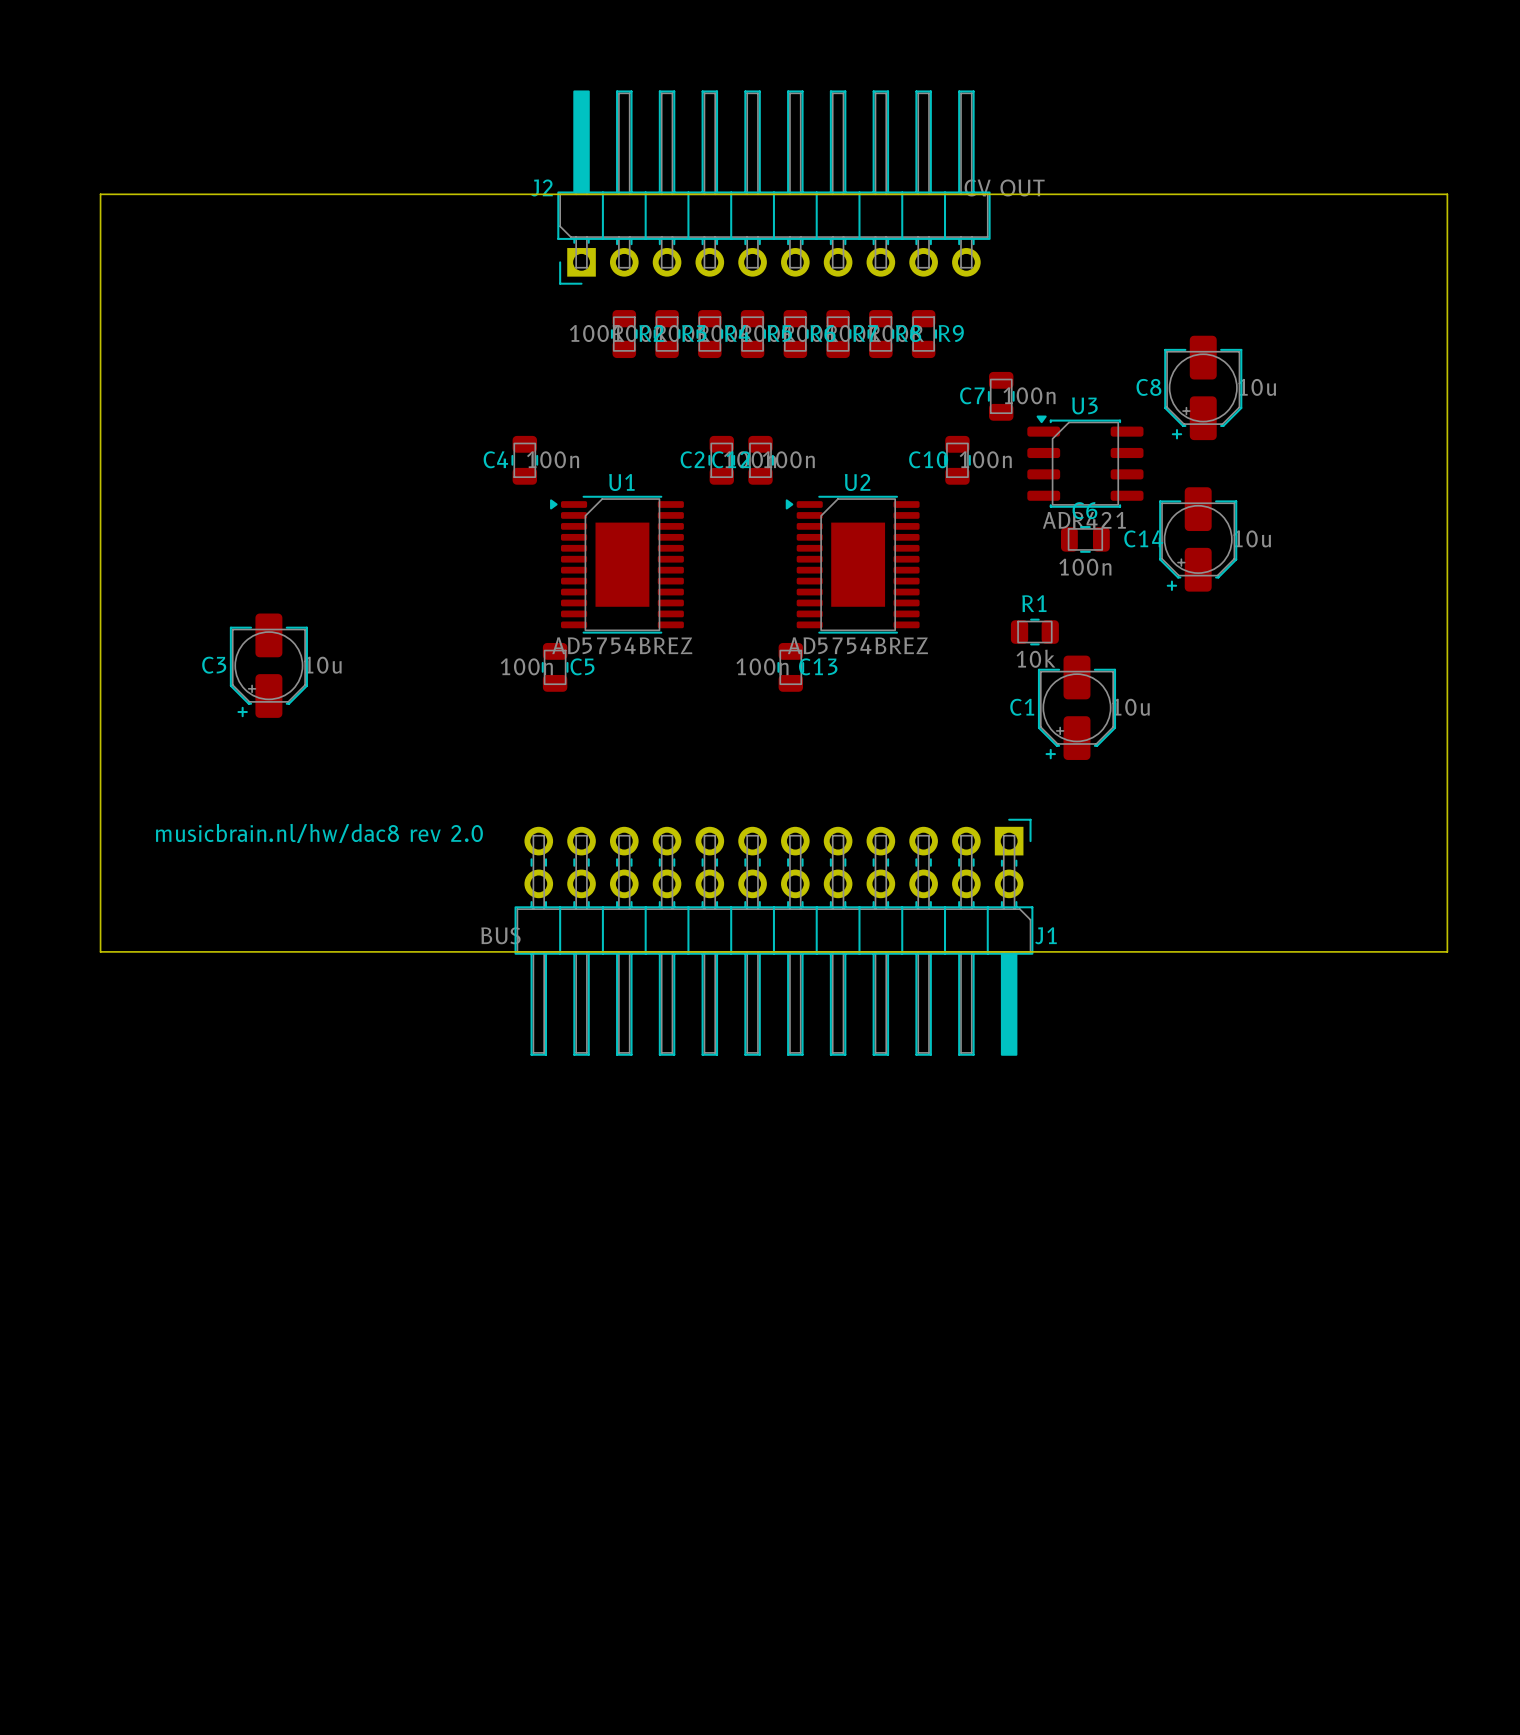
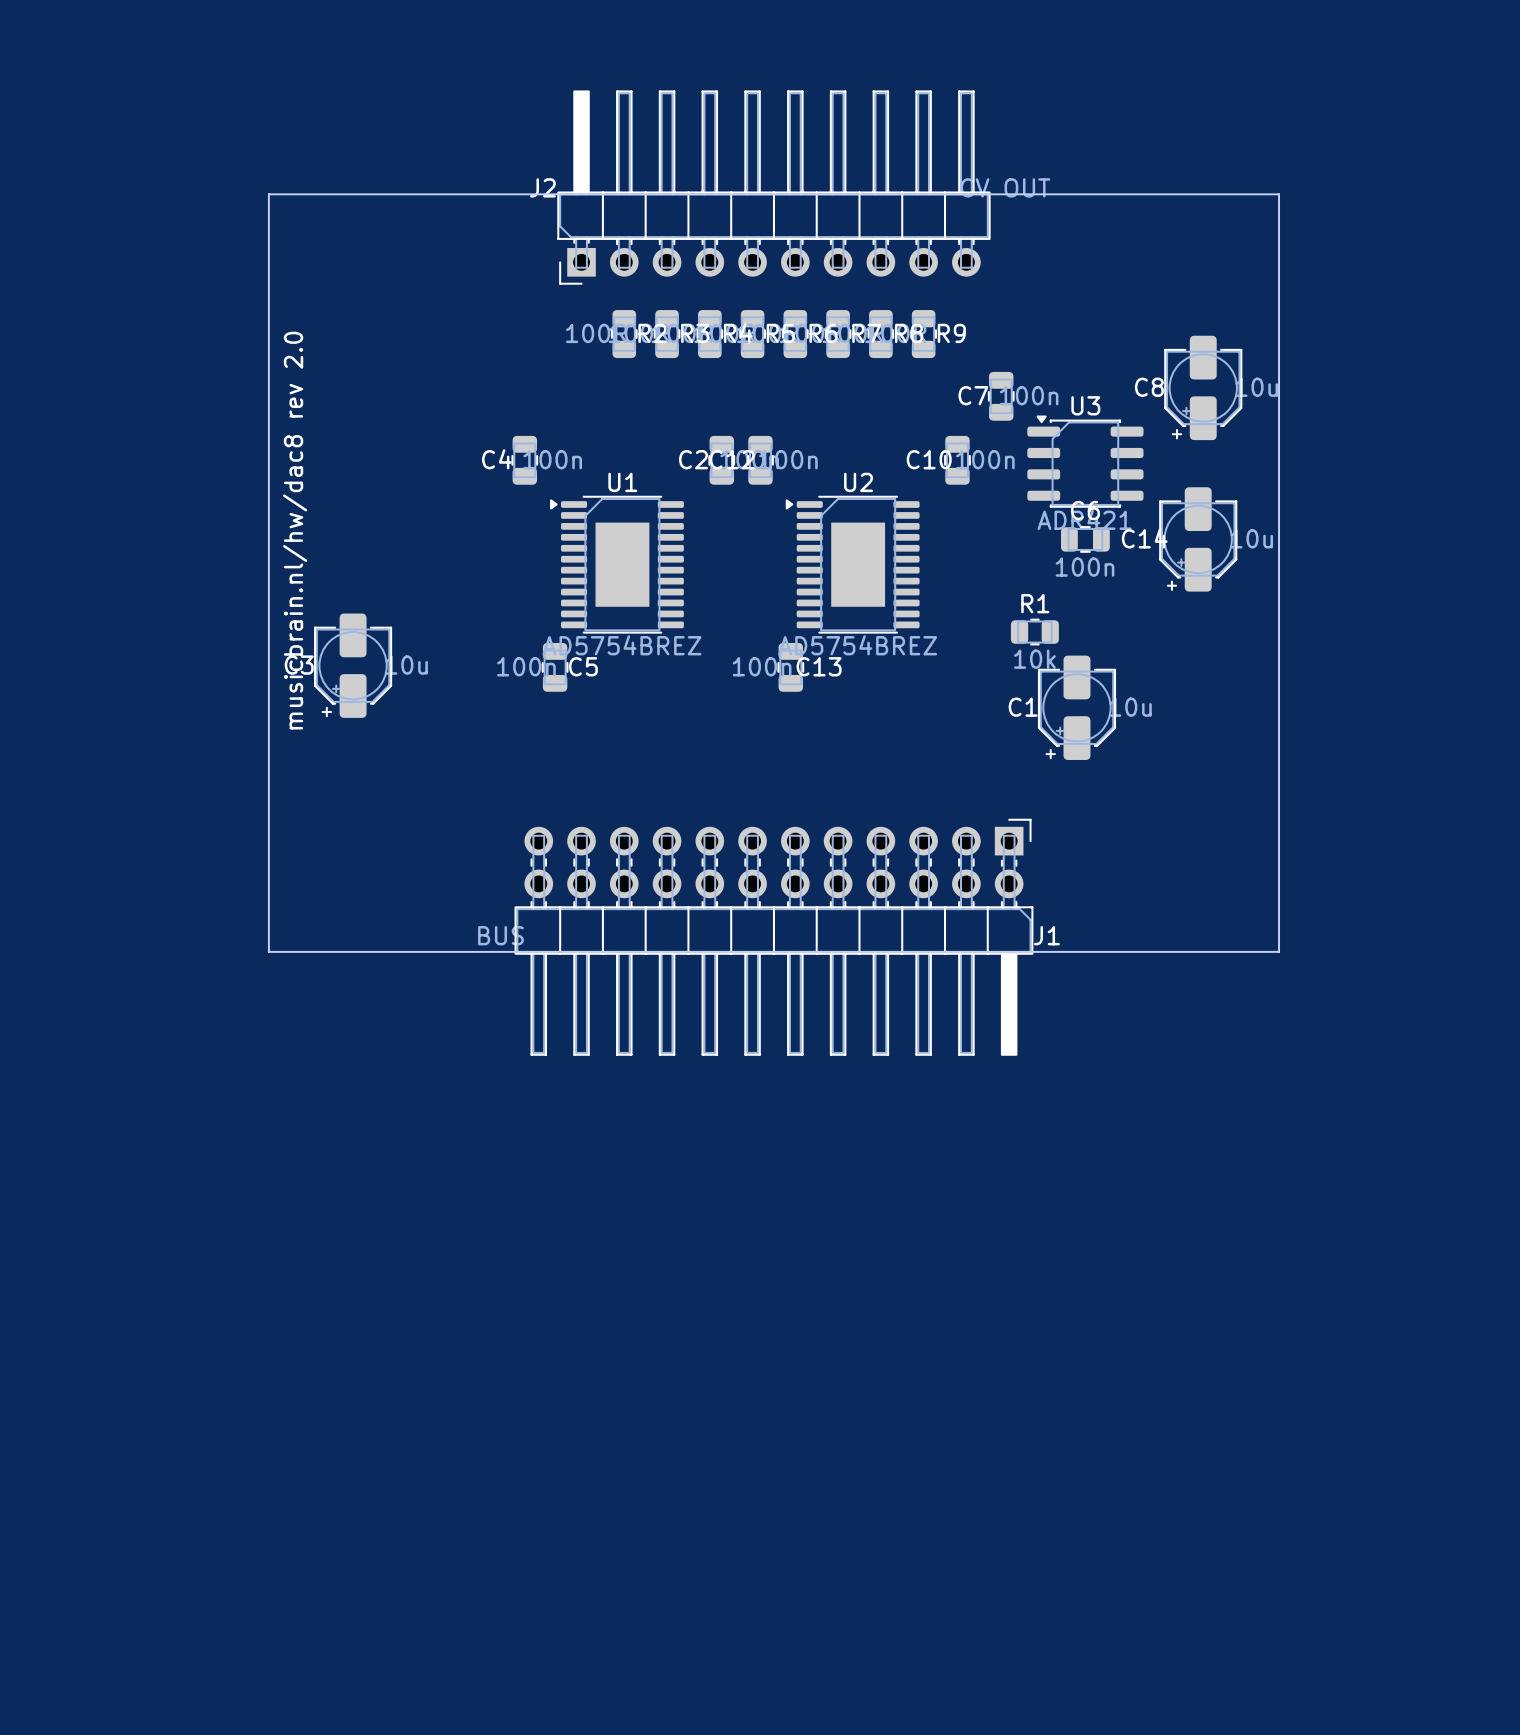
board edge: (268, 194) (100, 194) (100, 951) (268, 951) -> (268, 194) (268, 951)
board edge: (1279, 194) (1447, 194) (1447, 951) (1279, 951) -> (1279, 194) (1279, 951)
C3 position: (268, 665) -> (353, 665)
text rotation: 0° (319, 833) -> 90° counterclockwise (295, 530)

